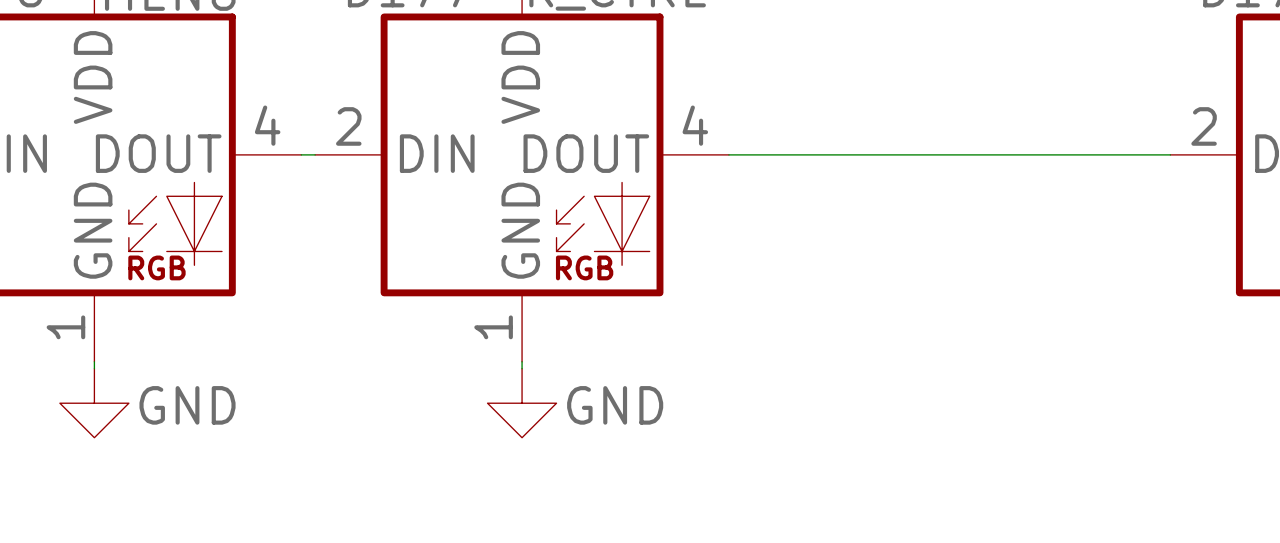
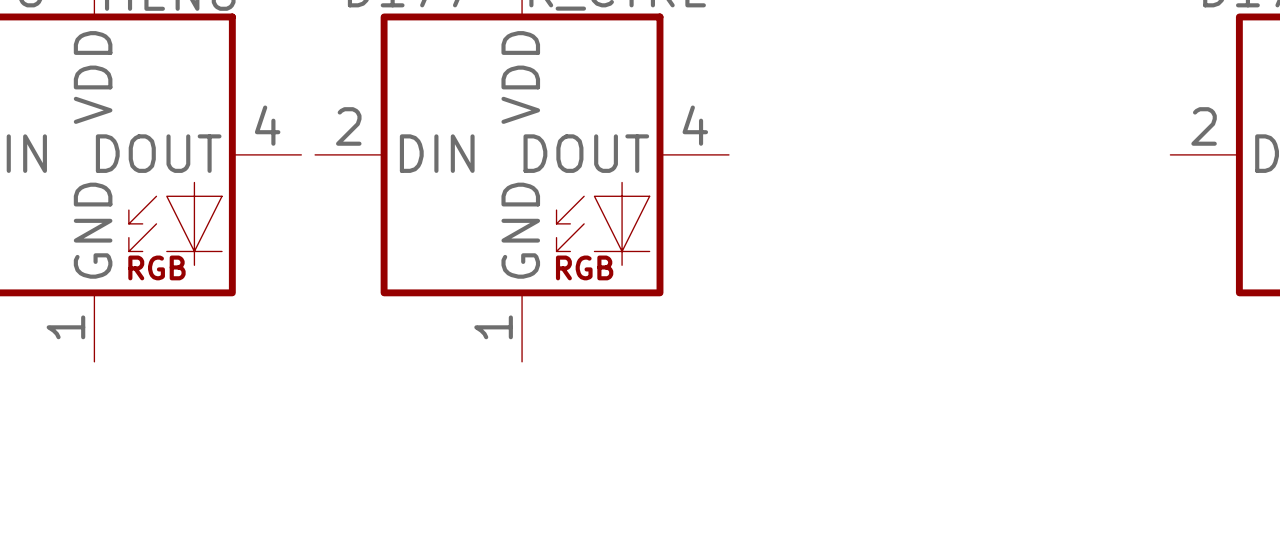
wire: (301, 154) (315, 154) -> none
wire: (728, 154) (1170, 154) -> none
wire: (94, 361) (94, 368) -> none
wire: (522, 361) (522, 368) -> none
power symbol: GND (94, 403) -> none
power symbol: GND (522, 403) -> none

